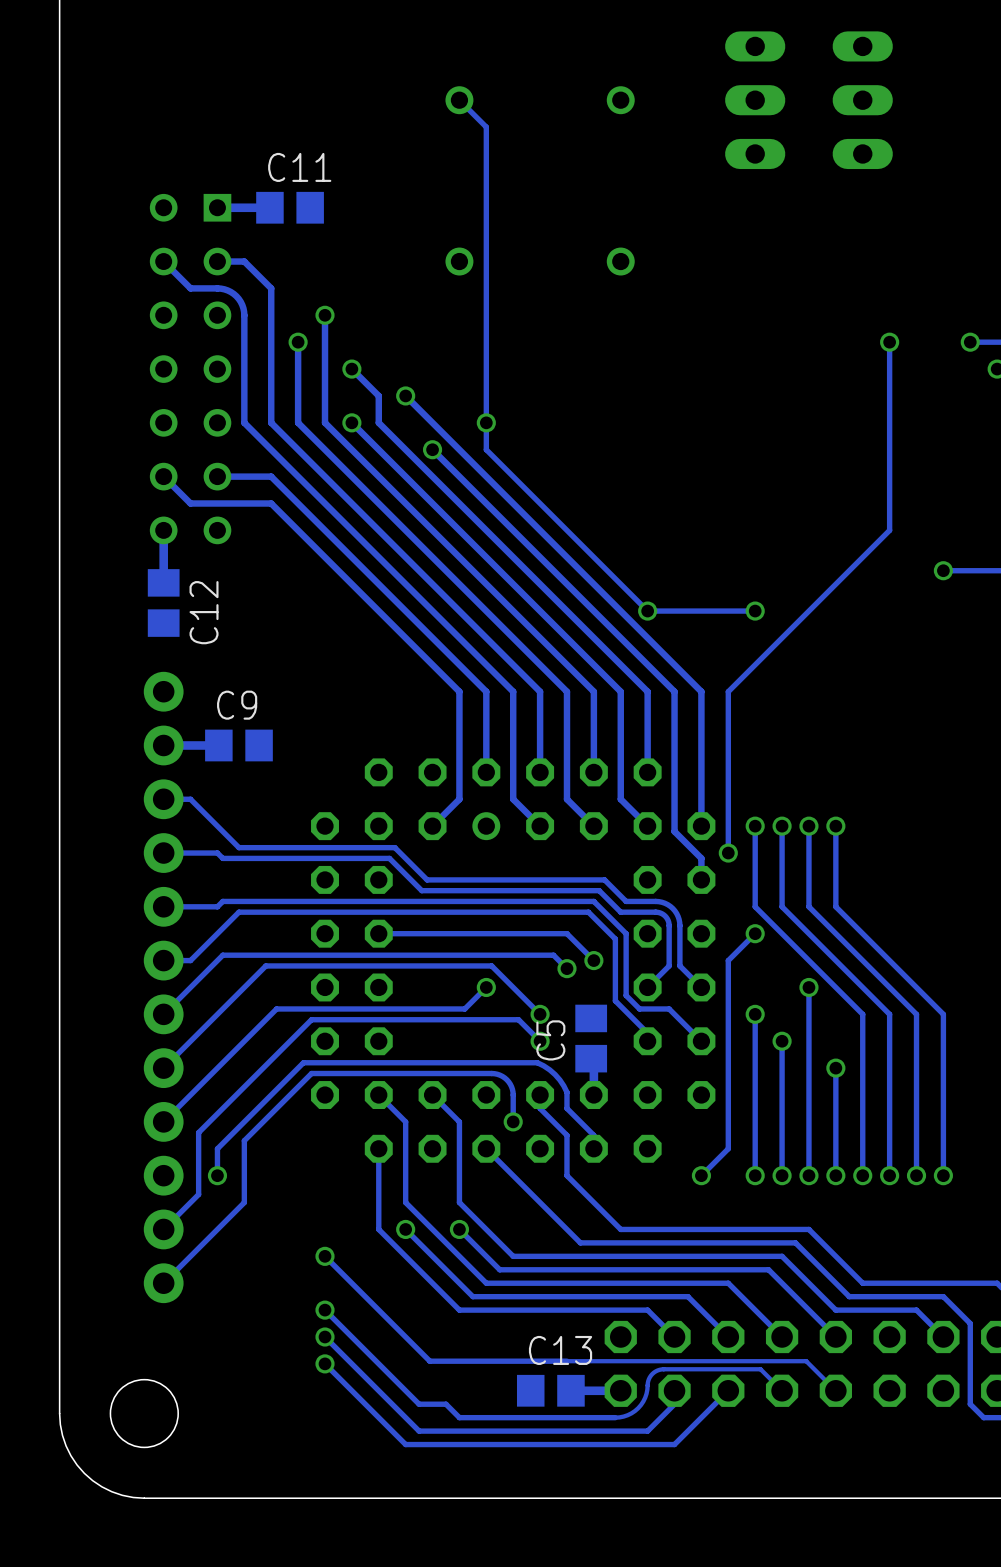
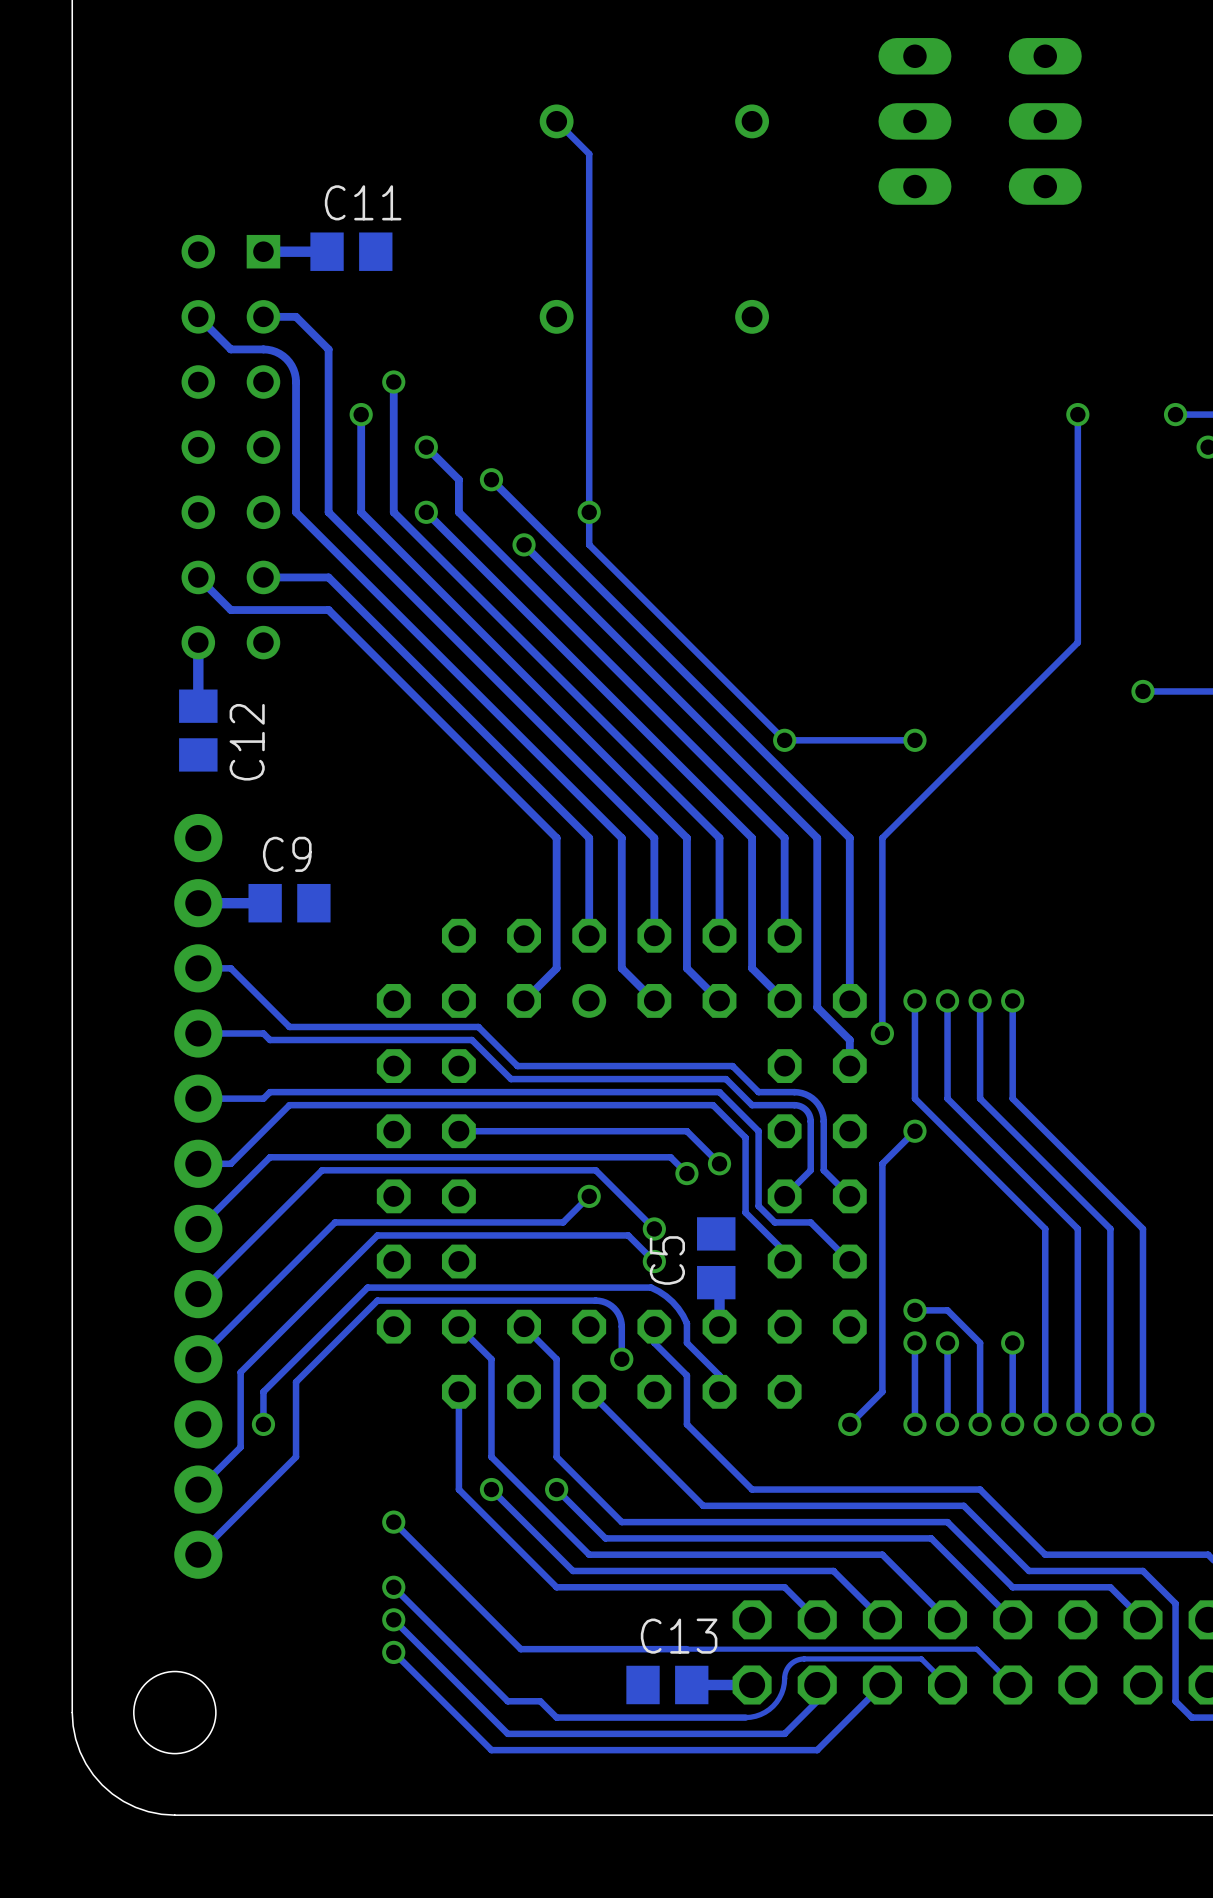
track: (808, 987) (808, 1108) -> (914, 1310) (947, 1310) (980, 1342)
via: (808, 987) -> none
track: (755, 1014) (755, 1108) -> none
via: (755, 1014) -> none
track: (782, 1041) (782, 1108) -> none
via: (782, 1041) -> none
track: (835, 1068) (835, 1108) -> none
via: (835, 1068) -> none
via: none -> (914, 1310)
via: none -> (914, 1342)
via: none -> (947, 1342)
via: none -> (1012, 1342)

